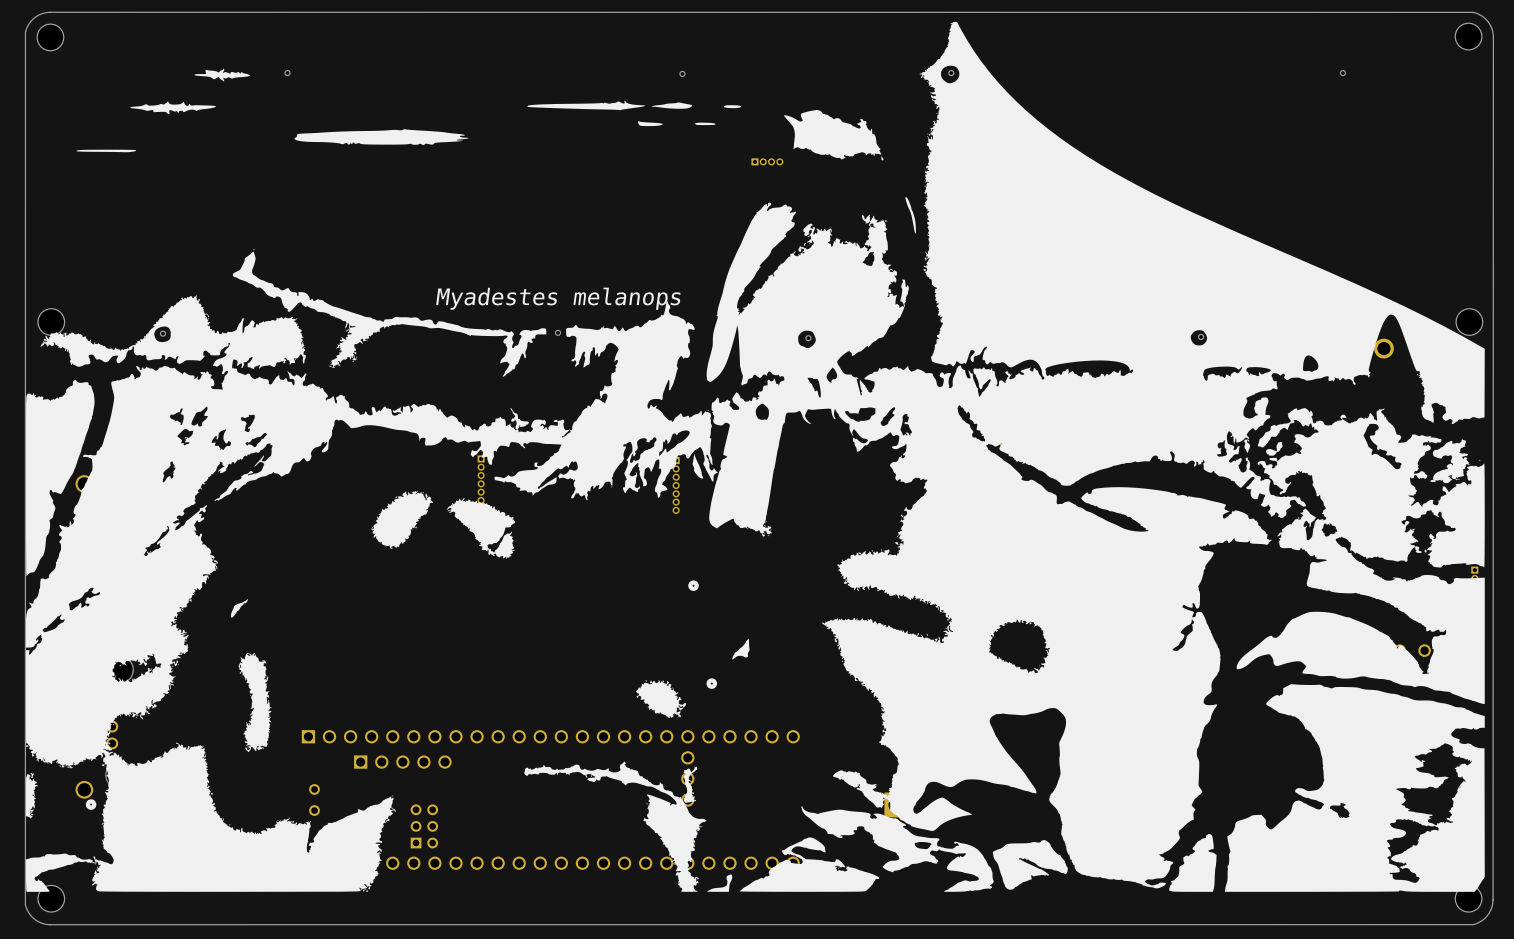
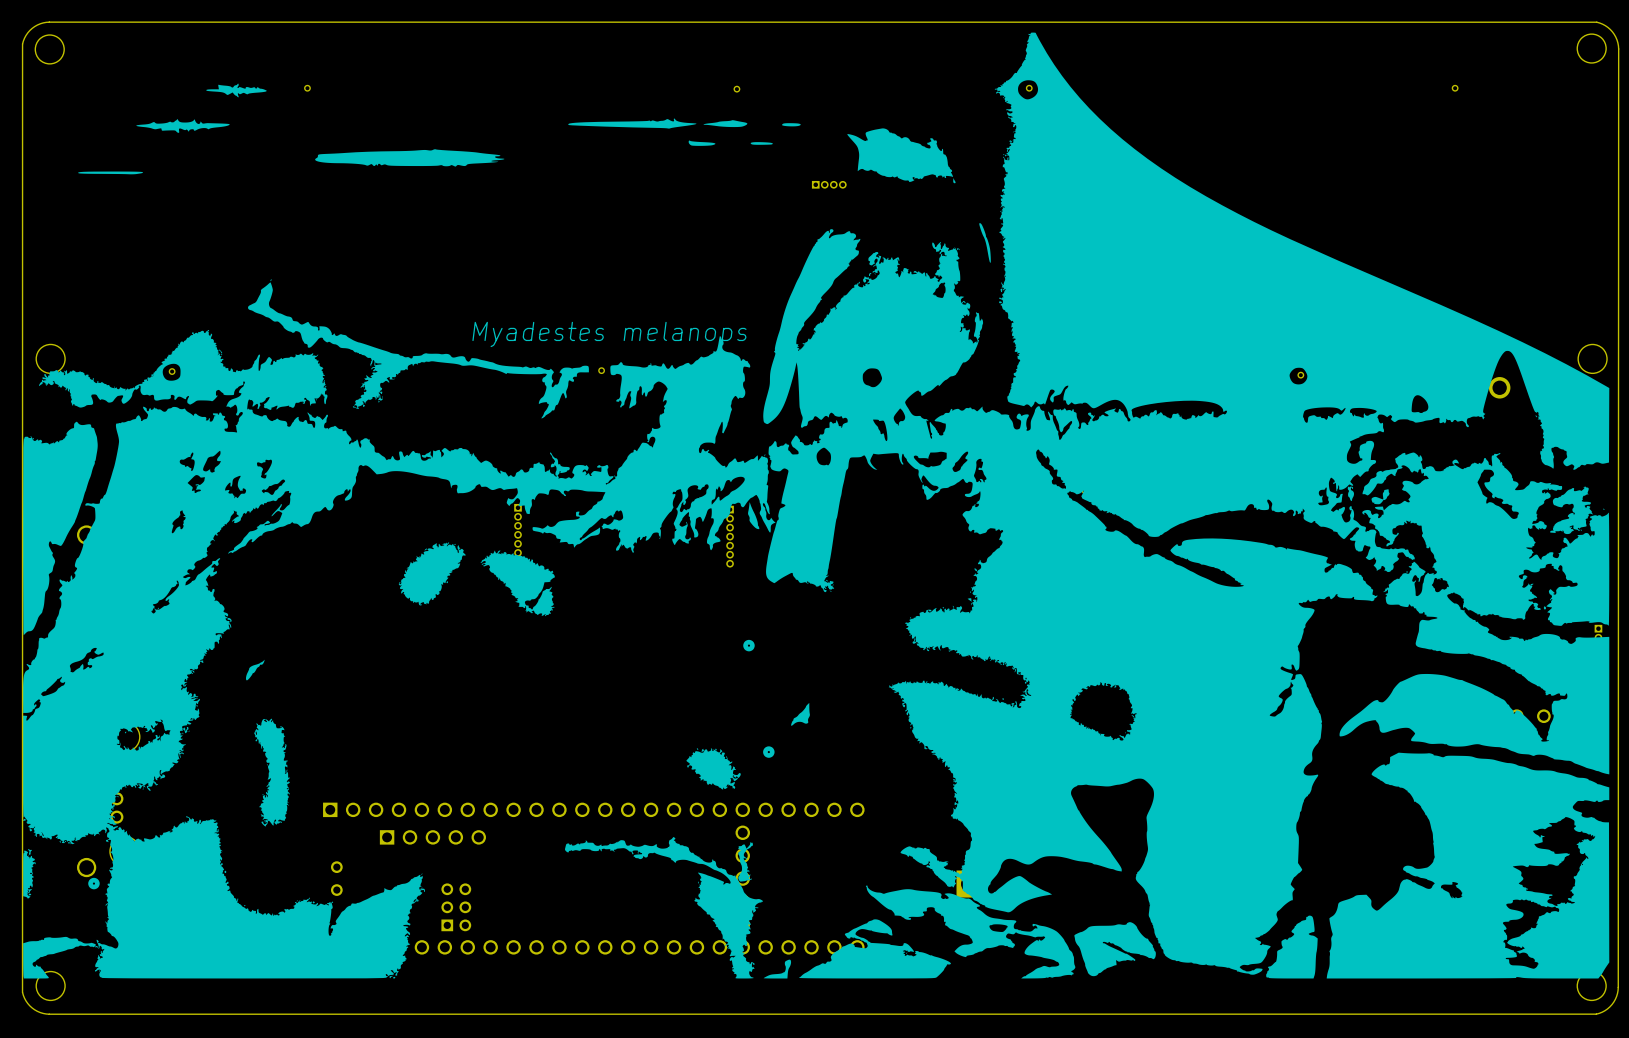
part: (808, 338) -> none

